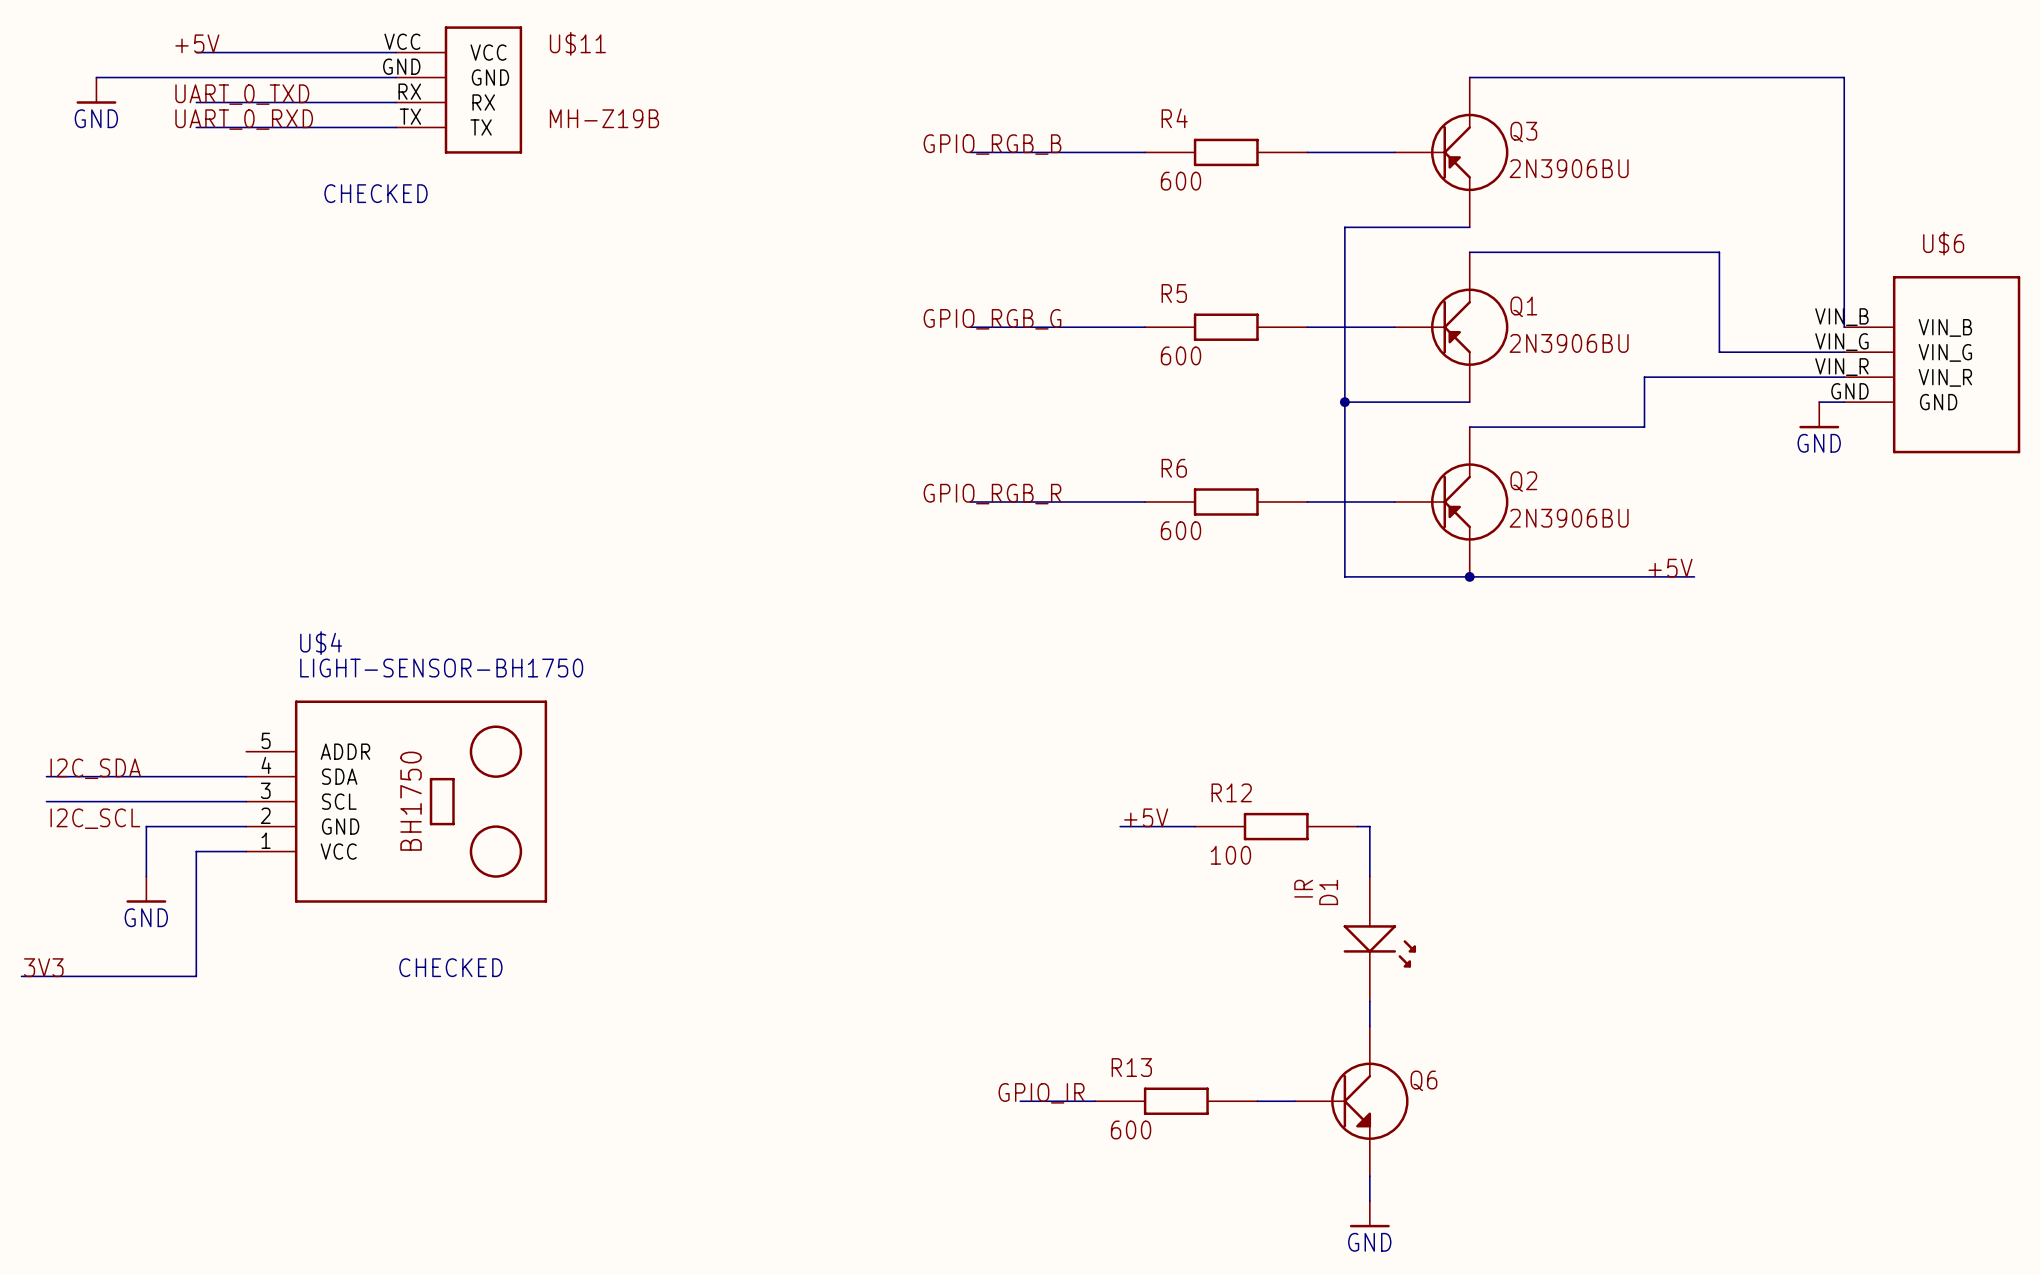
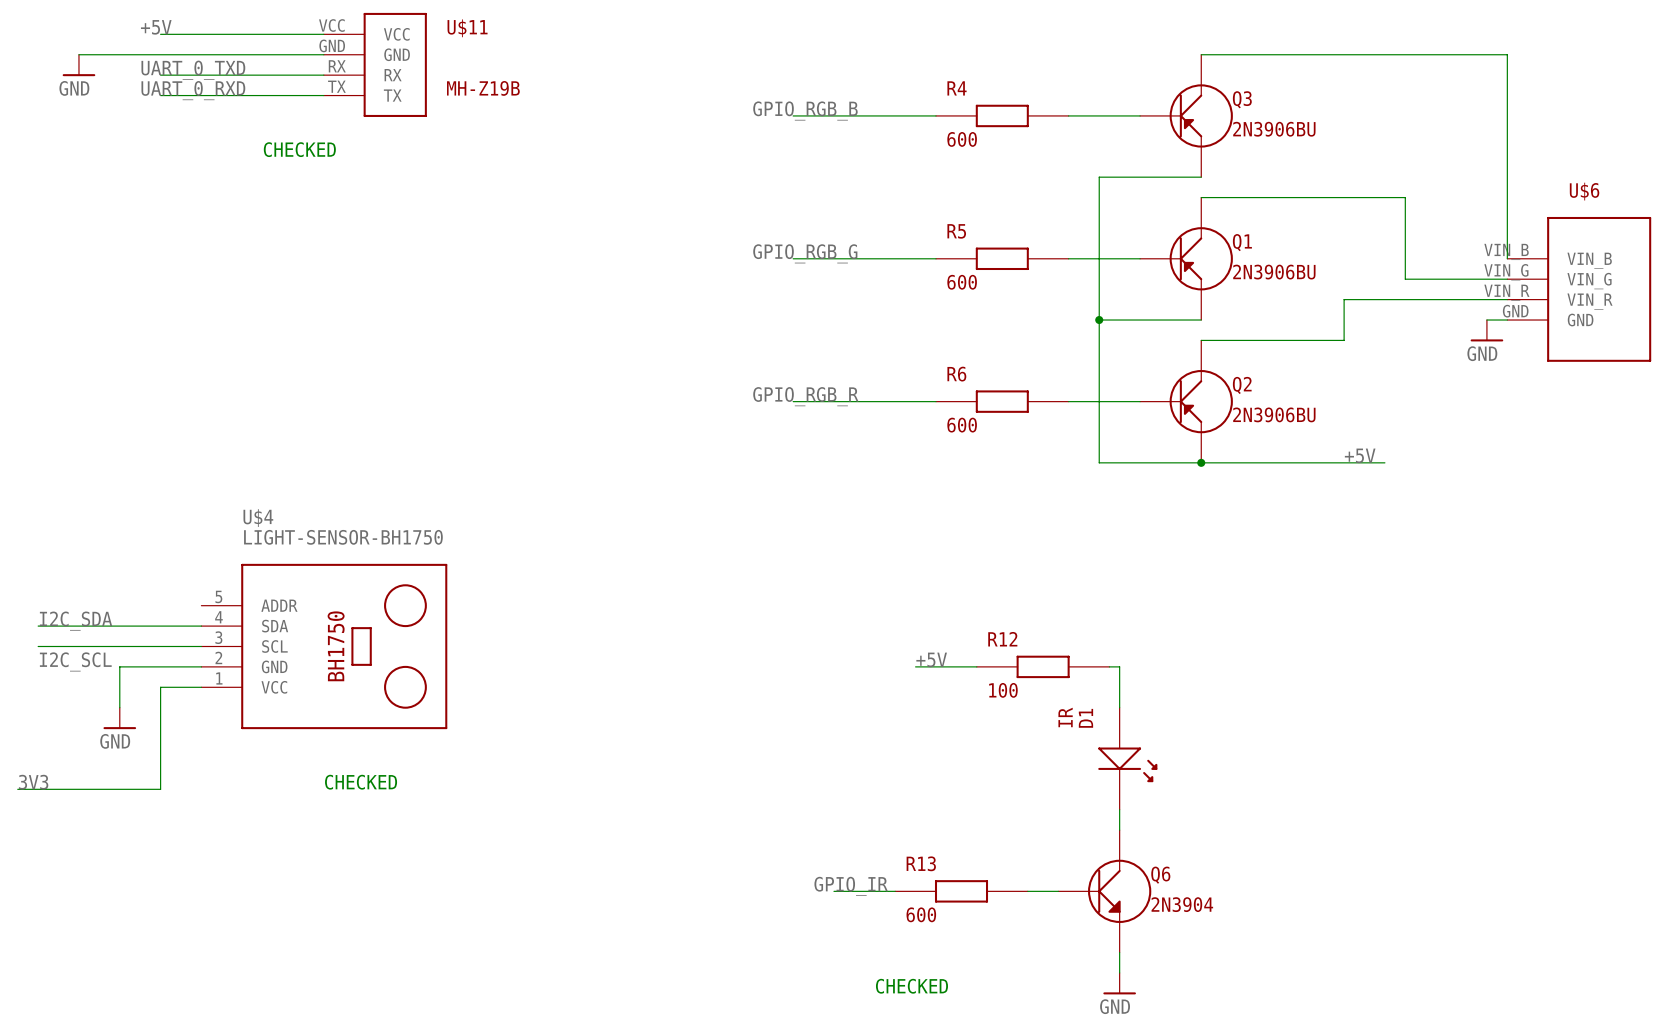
Q6 value: none -> 2N3904 (1182, 904)
text: none -> CHECKED (911, 986)

